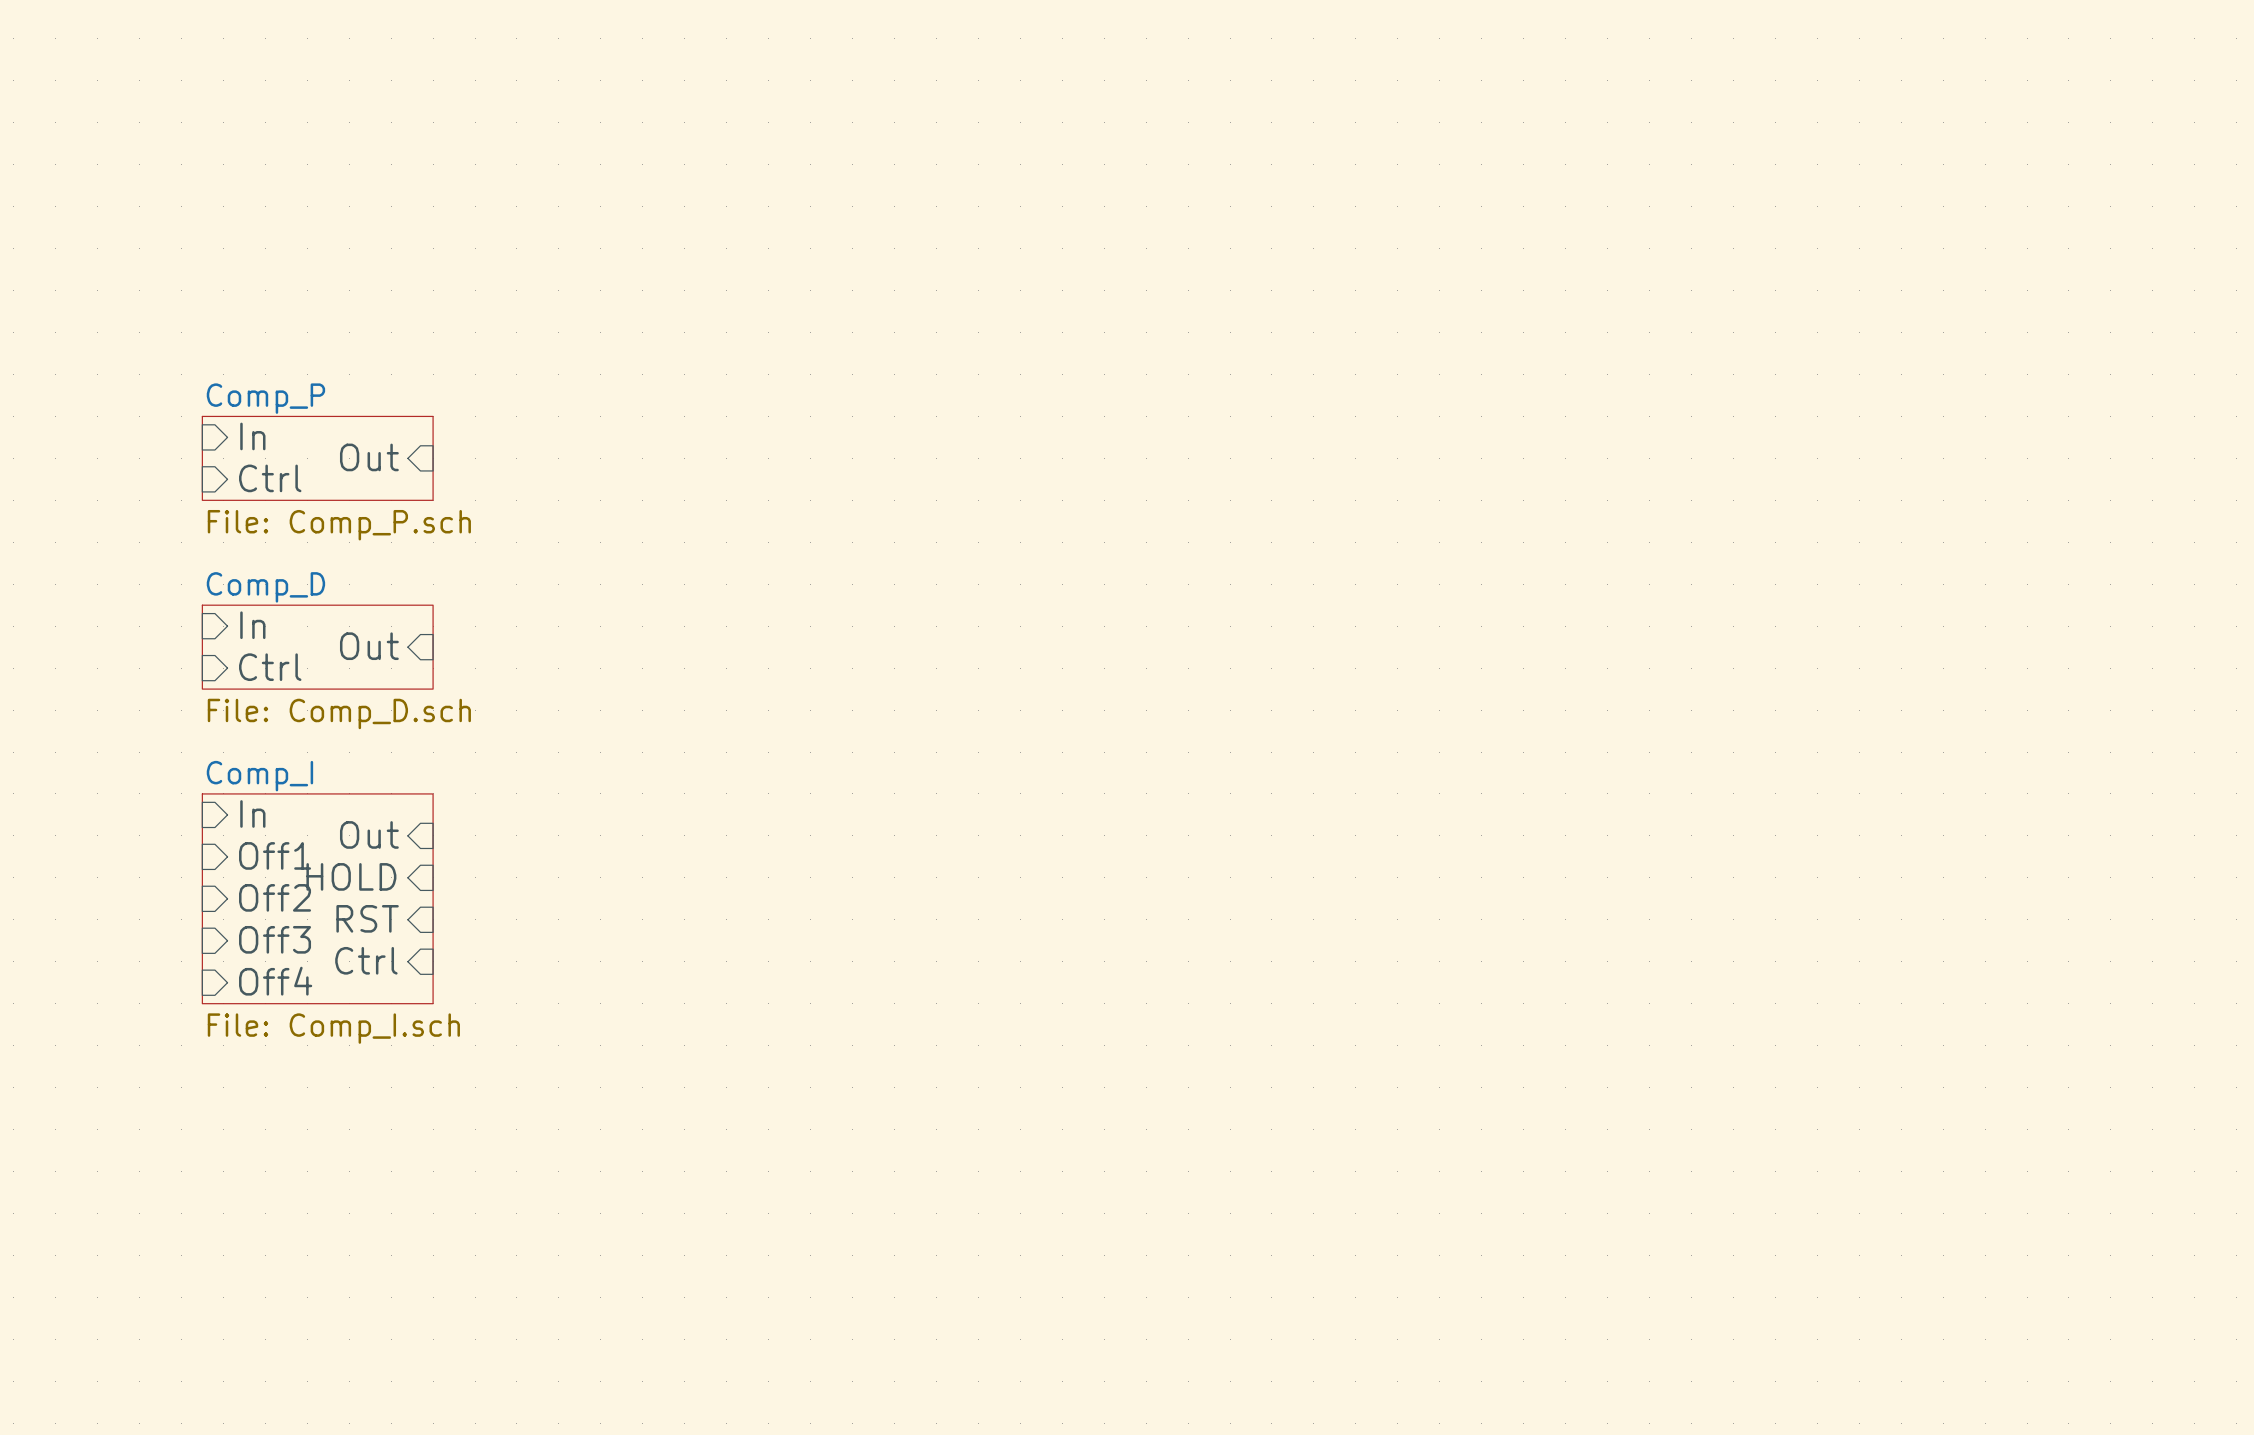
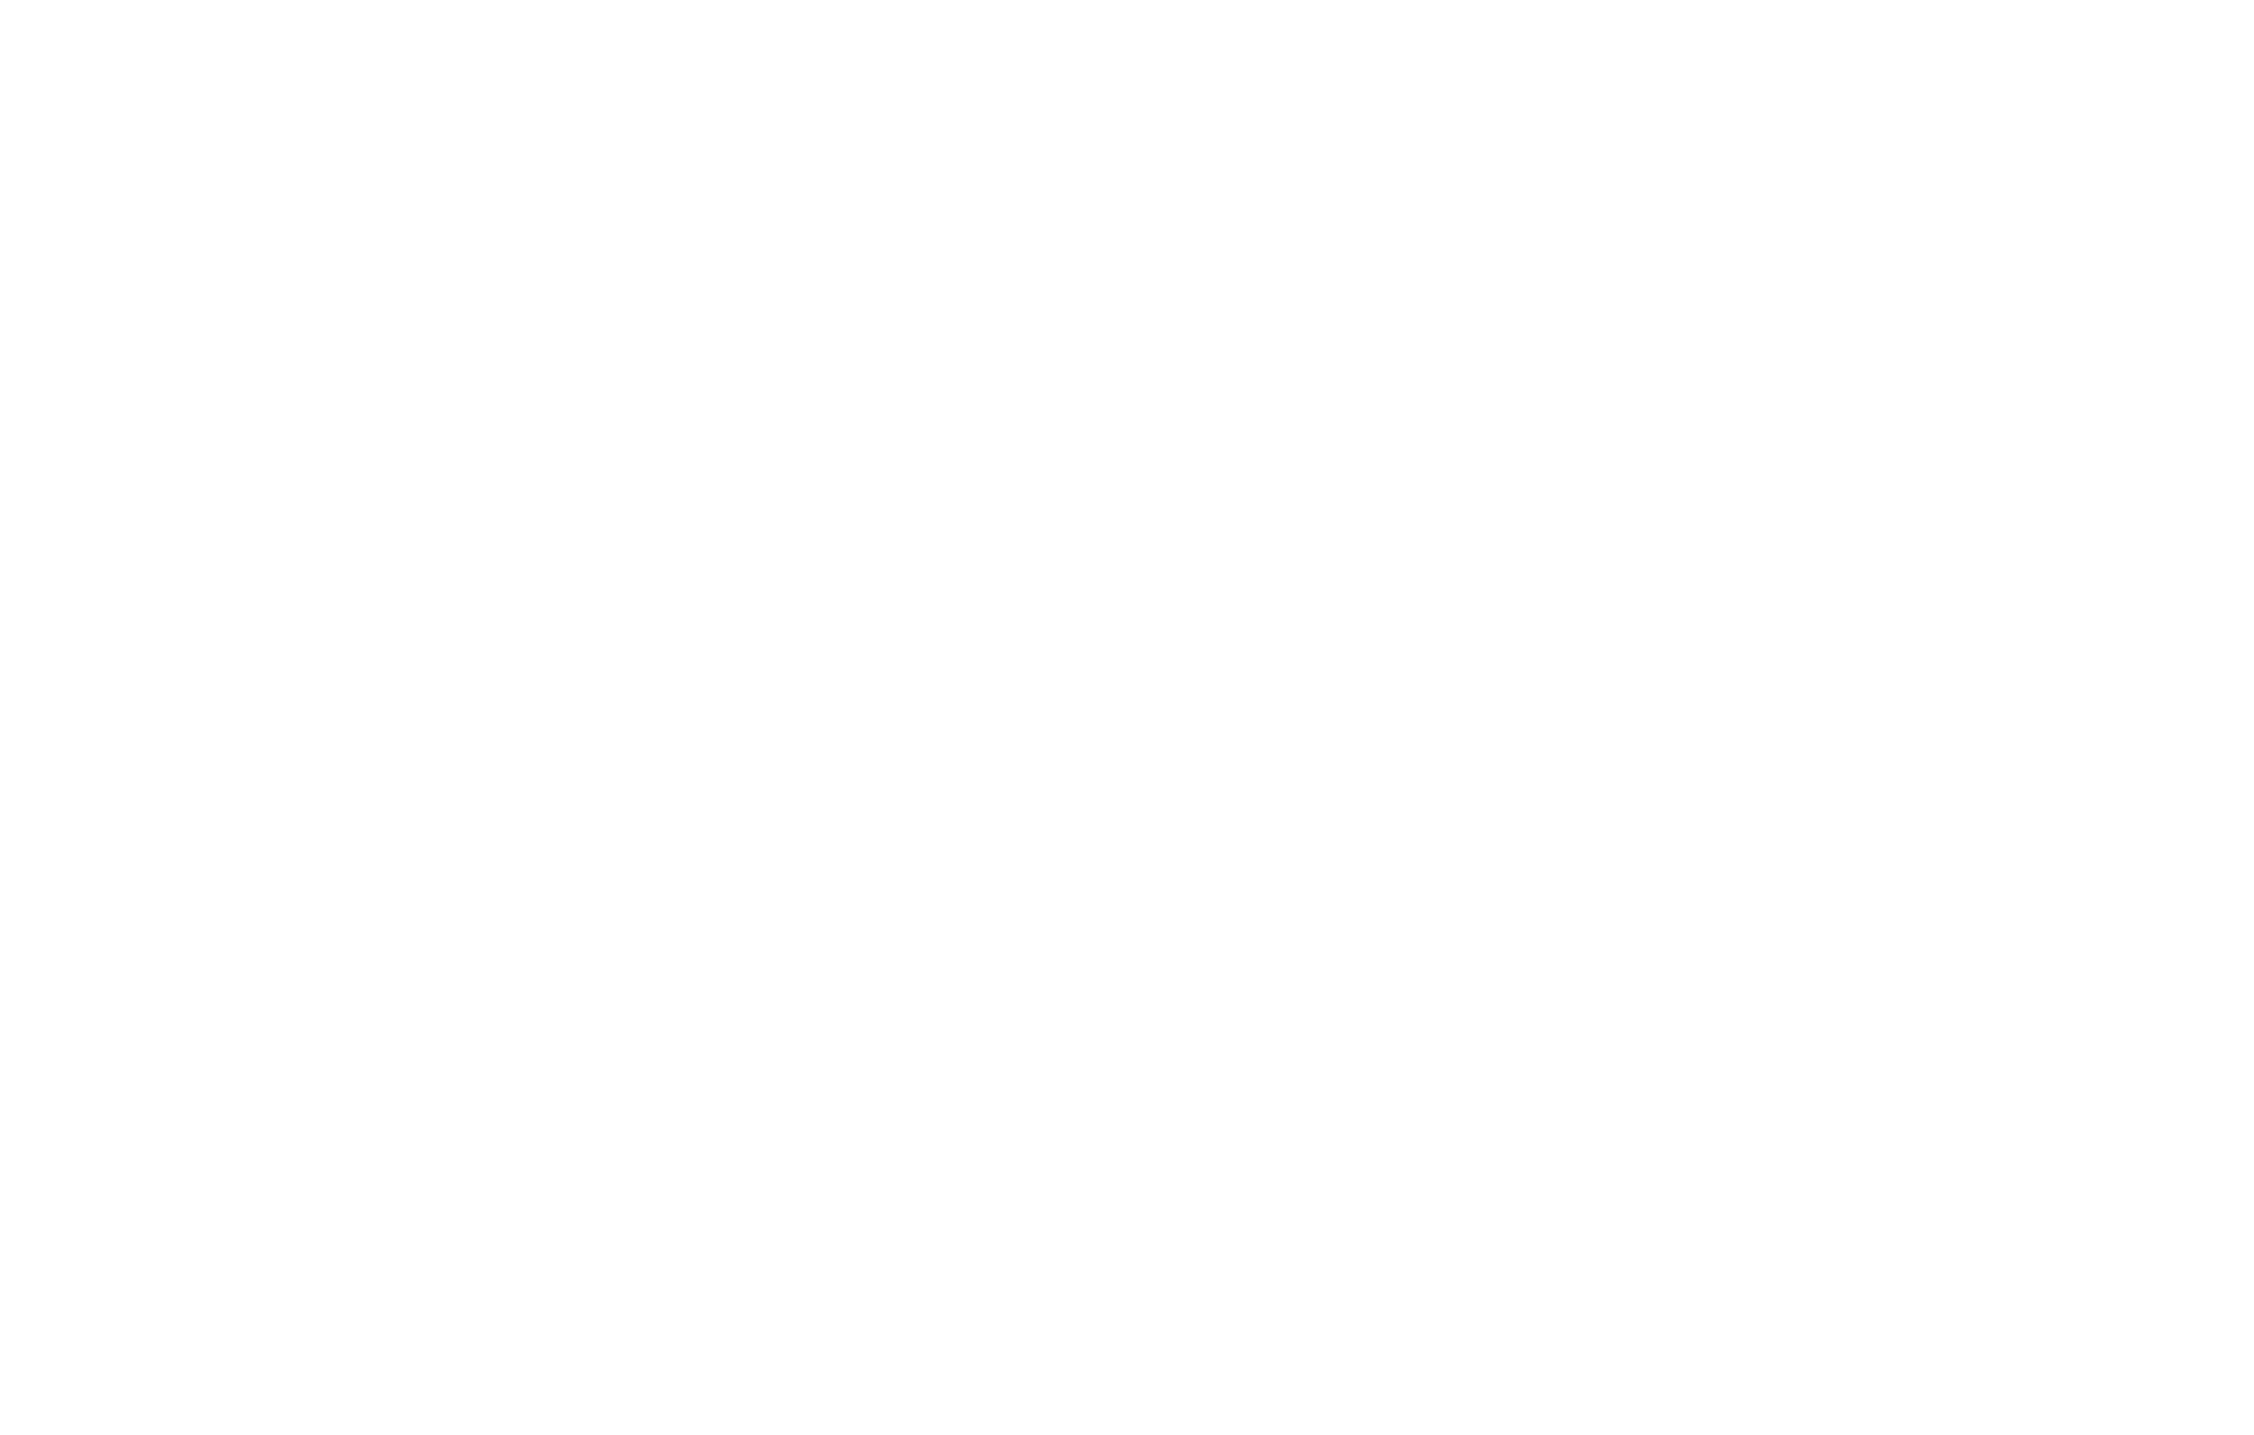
sheet pin: In (252, 436) -> none
sheet pin: Out (369, 457) -> none
sheet Comp_P: File: Comp_P.sch (317, 458) -> none
sheet pin: Ctrl (270, 478) -> none
sheet pin: In (252, 625) -> none
sheet pin: Out (369, 646) -> none
sheet Comp_D: File: Comp_D.sch (317, 647) -> none
sheet pin: Ctrl (270, 667) -> none
sheet pin: In (252, 813) -> none
sheet pin: Out (369, 834) -> none
sheet pin: Off1 (275, 855) -> none
sheet pin: HOLD (351, 876) -> none
sheet pin: Off2 (275, 897) -> none
sheet Comp_I: File: Comp_I.sch (317, 898) -> none
sheet pin: RST (367, 918) -> none
sheet pin: Off3 (275, 939) -> none
sheet pin: Ctrl (366, 960) -> none
sheet pin: Off4 (275, 981) -> none

